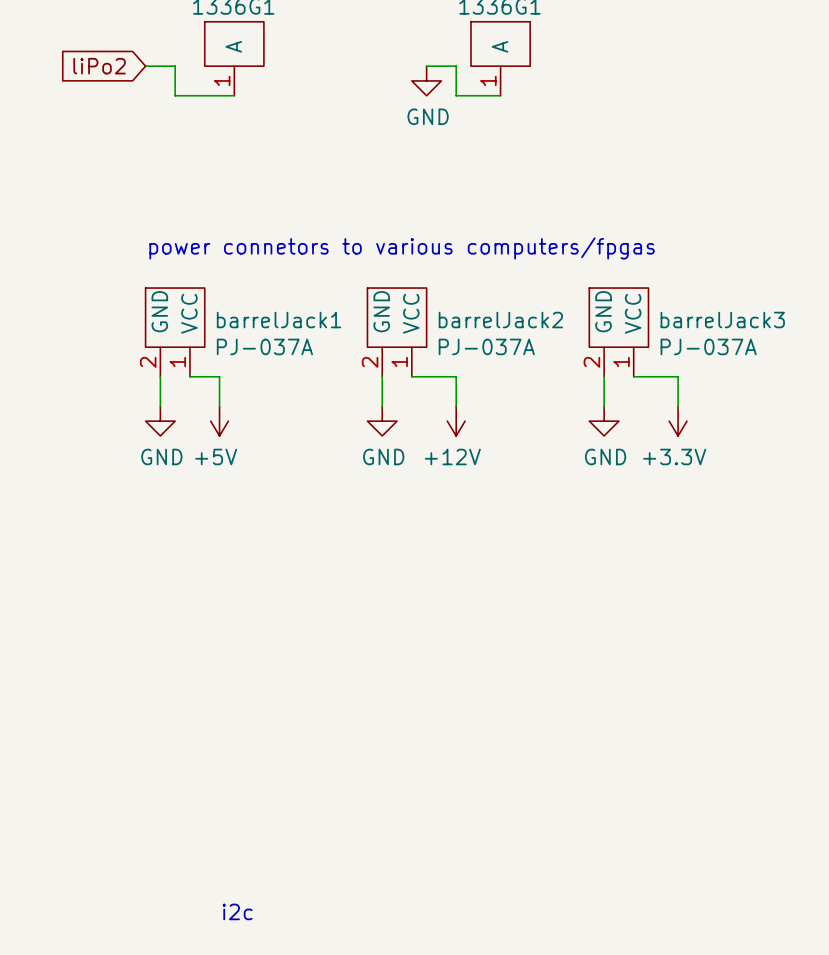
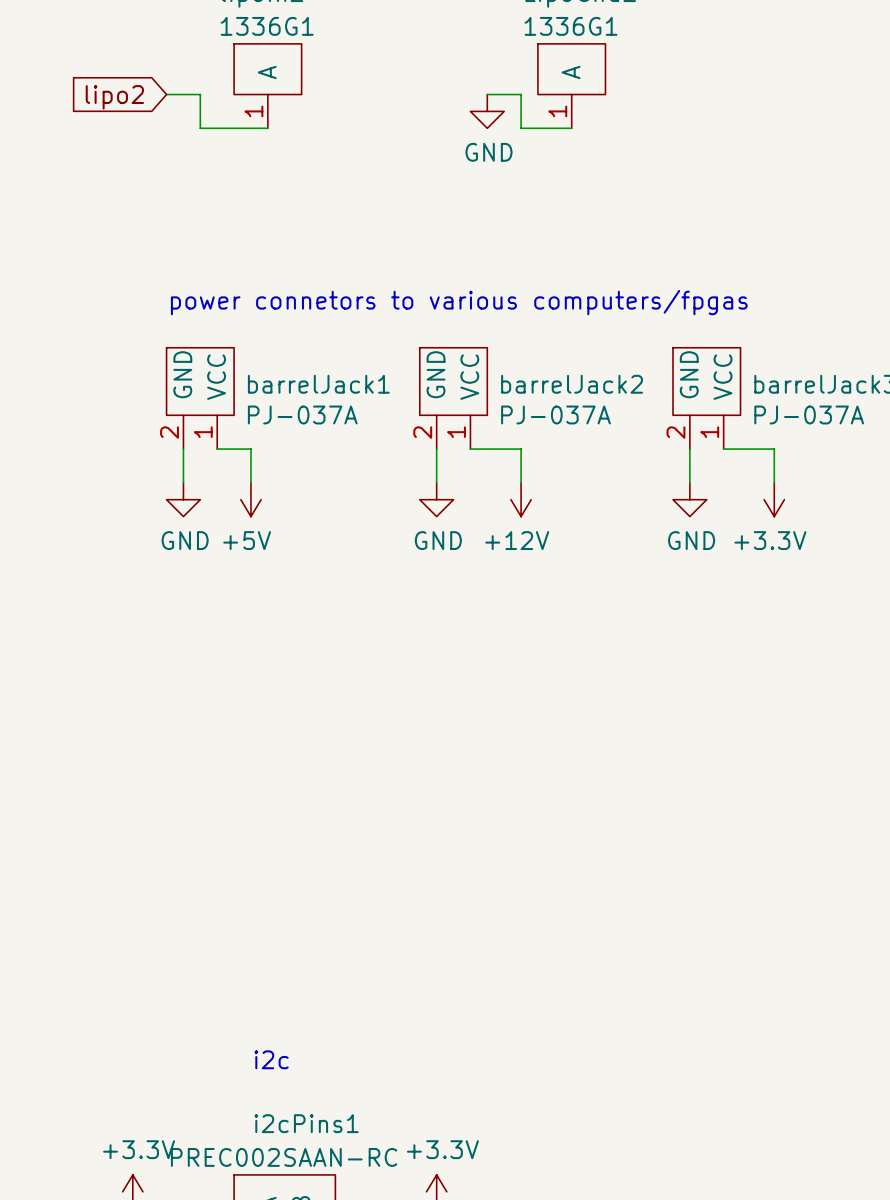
global label: liPo2 (99, 66) -> lipo2 (114, 97)

